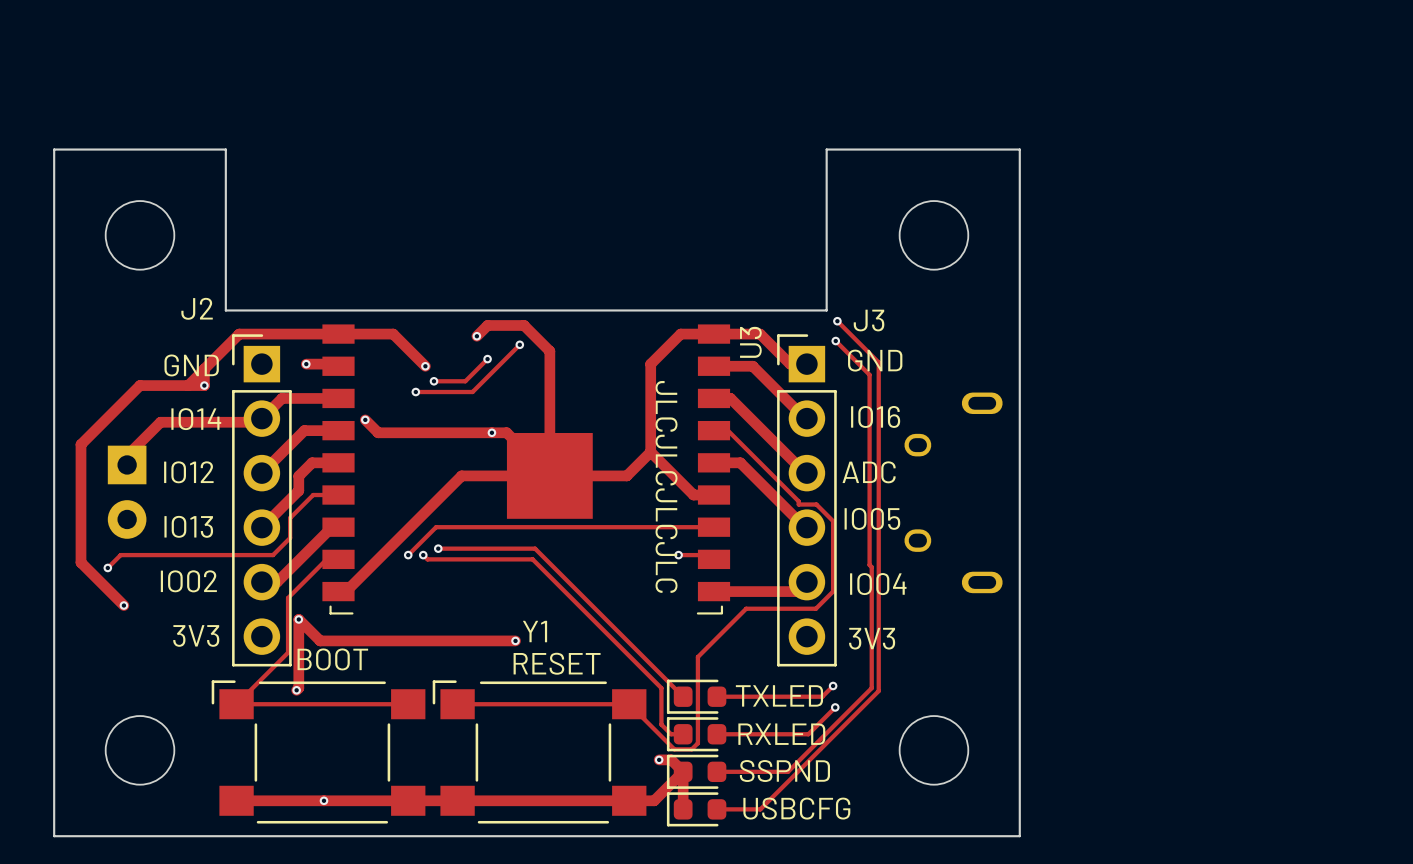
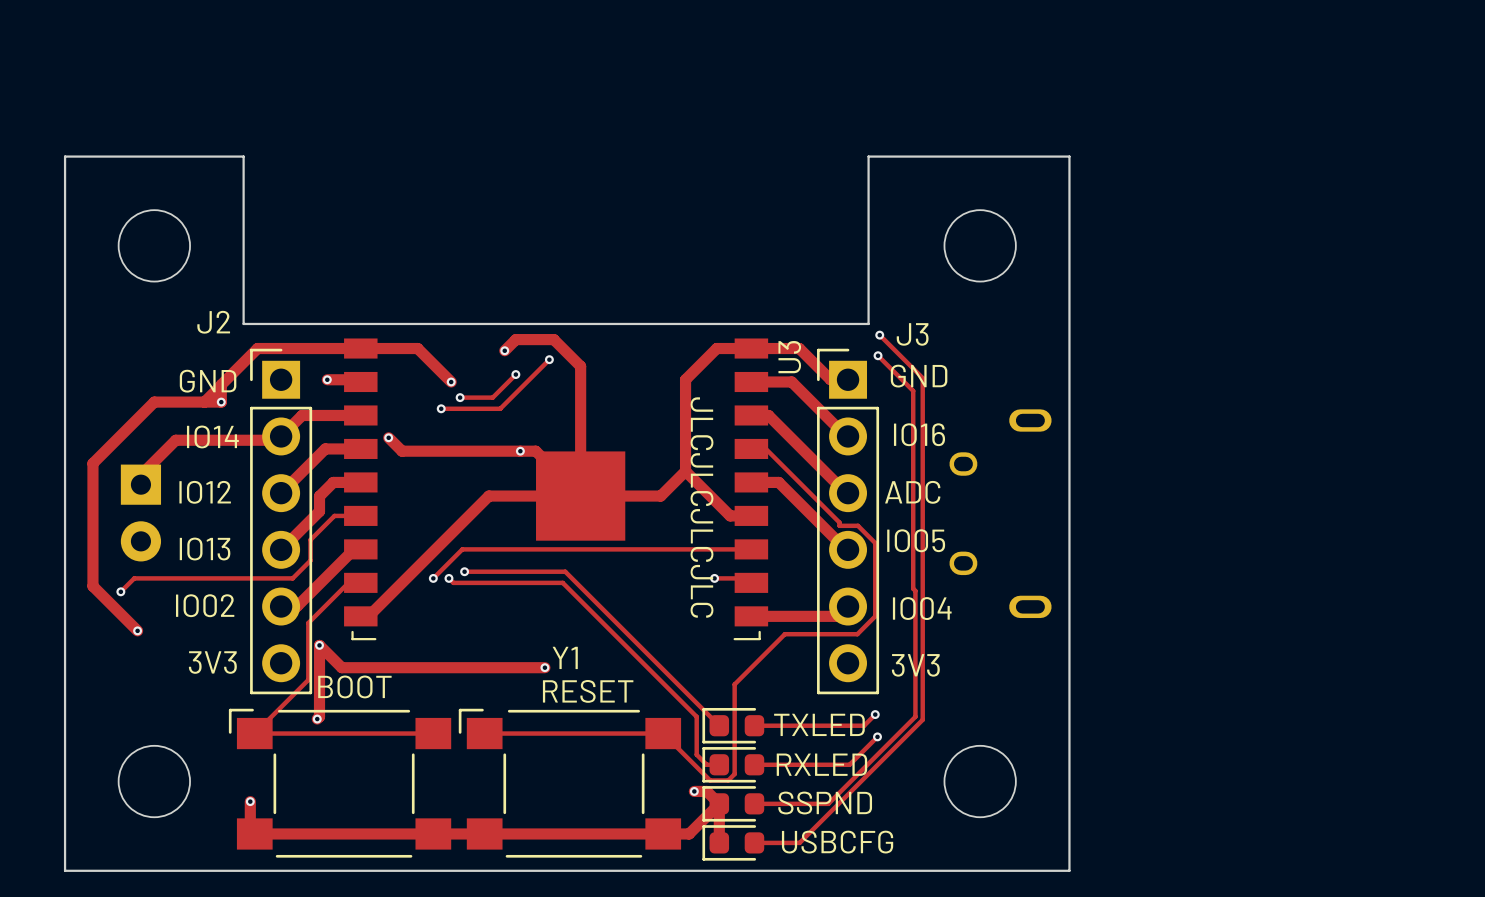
track: none -> (250, 801) (250, 829)
via position: (323, 800) -> (250, 801)

